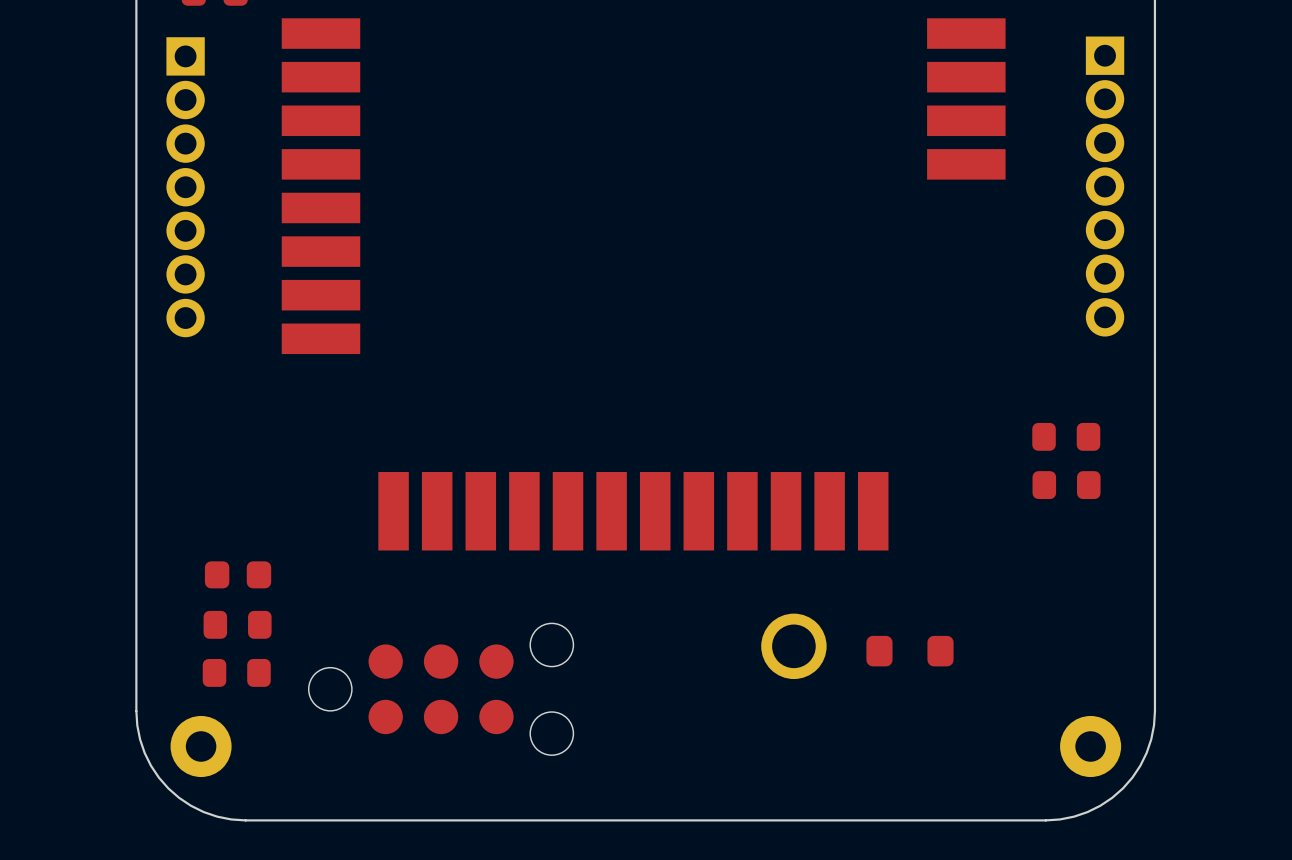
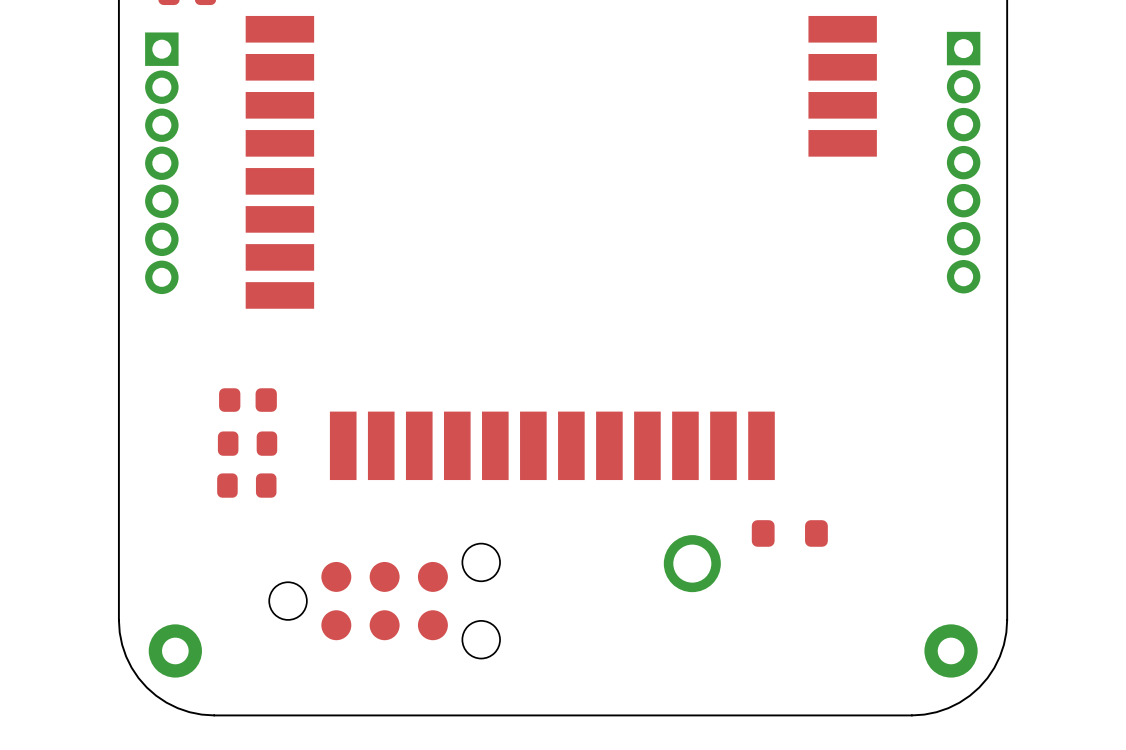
part: (1066, 436) -> none
part: (1066, 485) -> none
part: none -> (247, 443)
part: none -> (246, 485)
part position: (238, 574) -> (247, 400)
part: (237, 624) -> none
part position: (909, 651) -> (789, 533)
part: (236, 672) -> none

